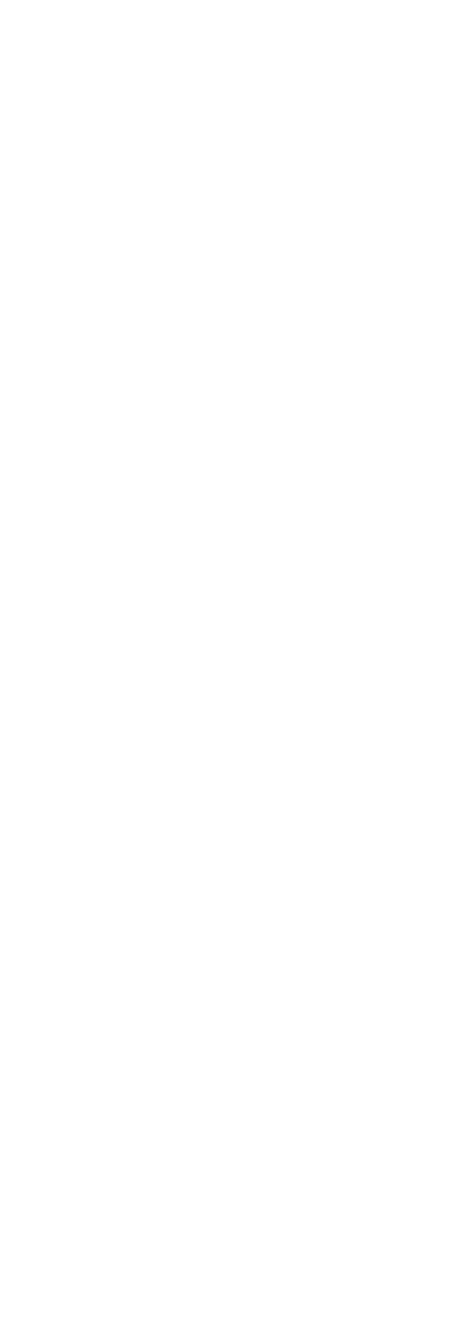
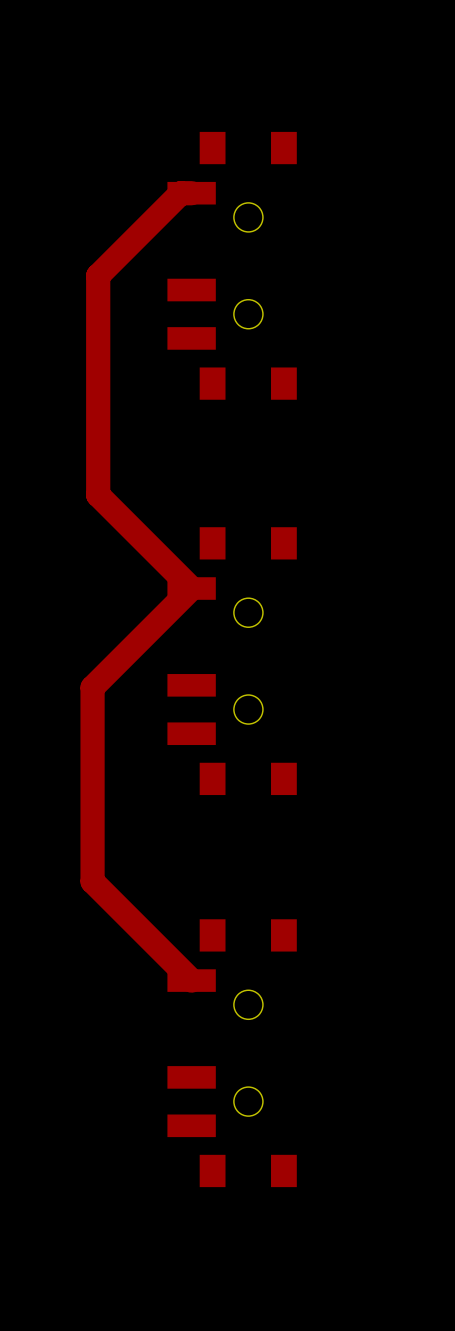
top track: none -> (191, 193) (180, 193) (98, 275) (98, 495) (191, 588) (92, 687) (92, 881) (191, 980)
part: none -> (232, 265)
part: none -> (232, 661)
part: none -> (232, 1053)

